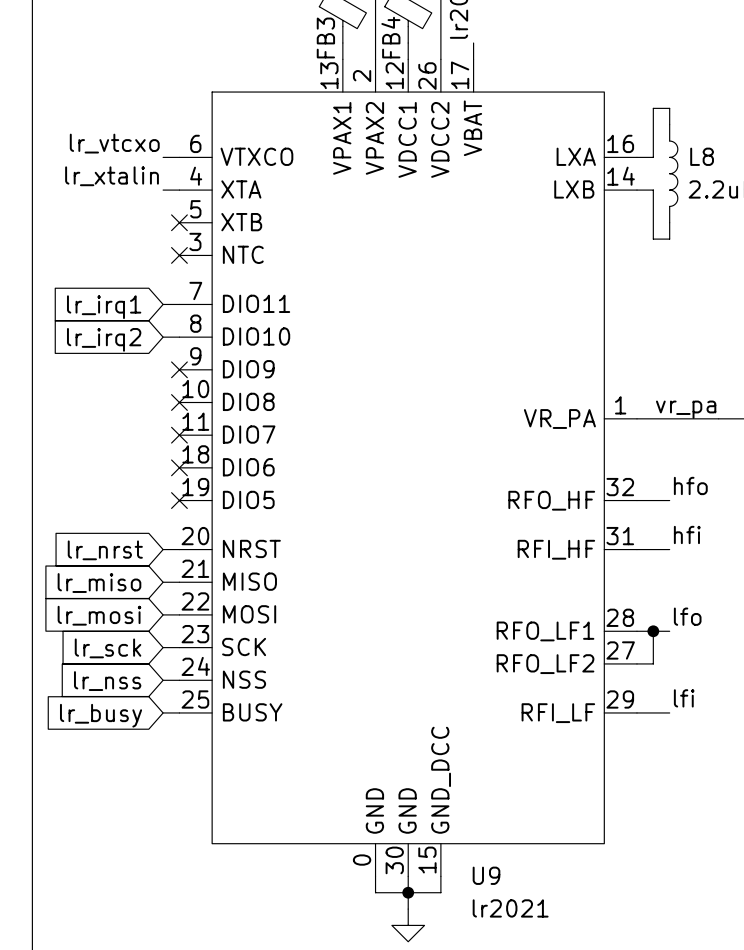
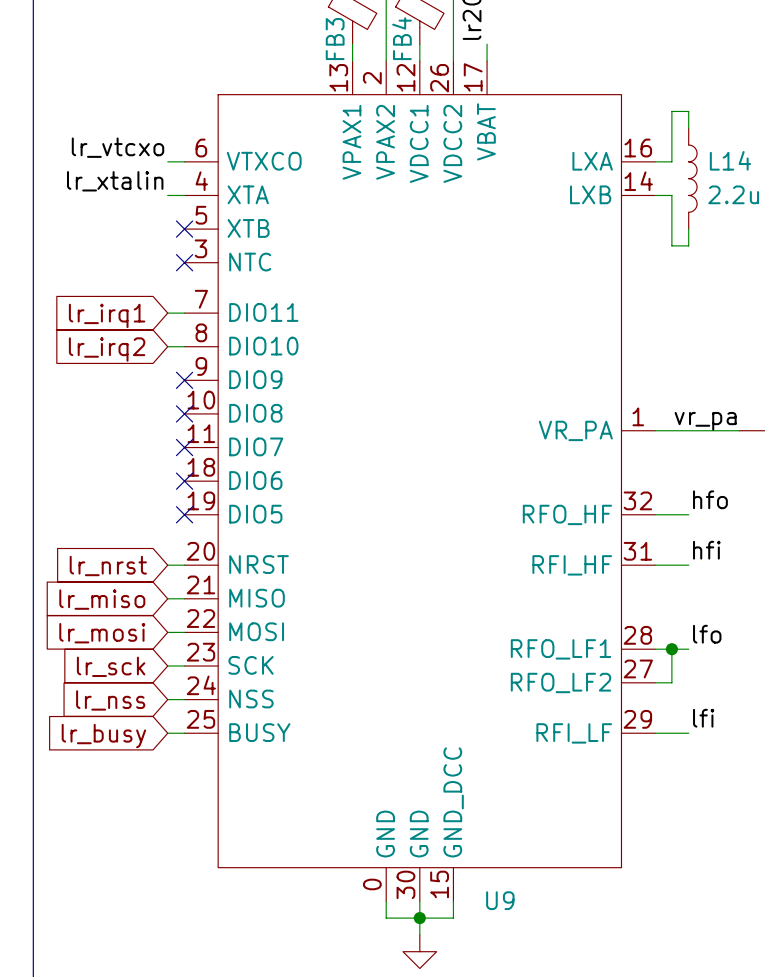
L8 name: L8 (702, 156) -> L14 (730, 160)
U9 value: lr2021 (510, 908) -> none

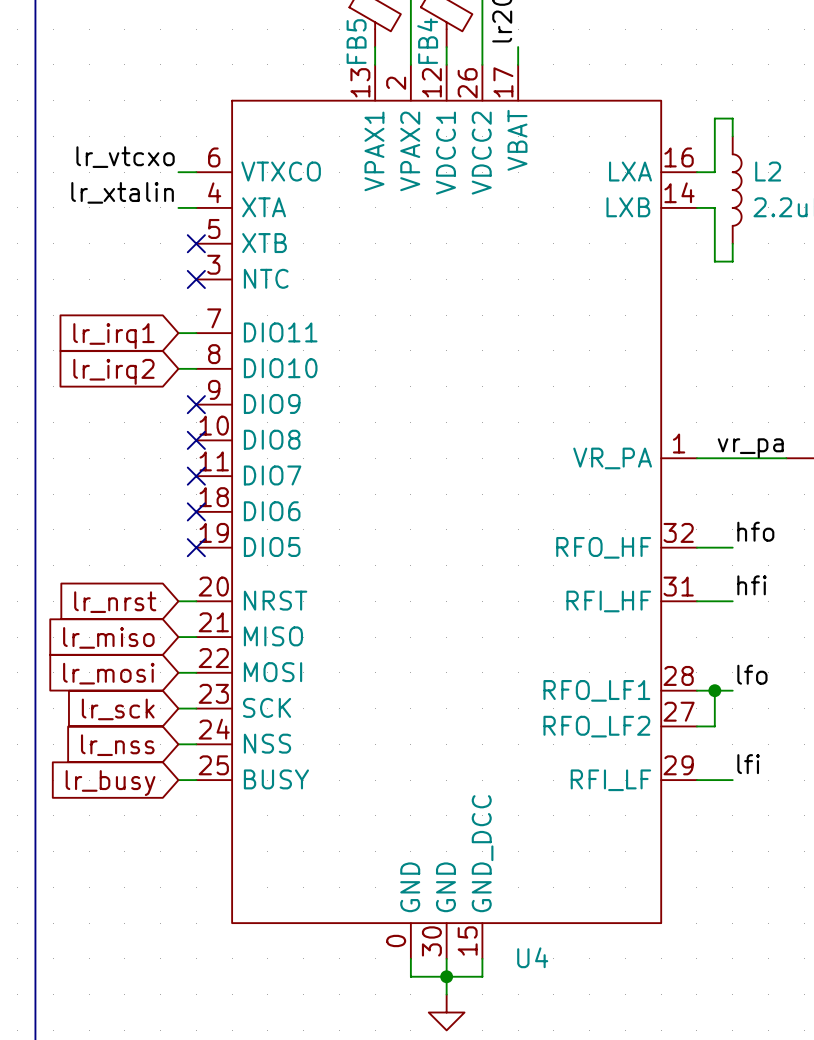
FB3 name: FB3 (335, 39) -> FB5 (356, 41)
L14 name: L14 (730, 160) -> L2 (768, 171)
U9 name: U9 (500, 900) -> U4 (532, 957)

